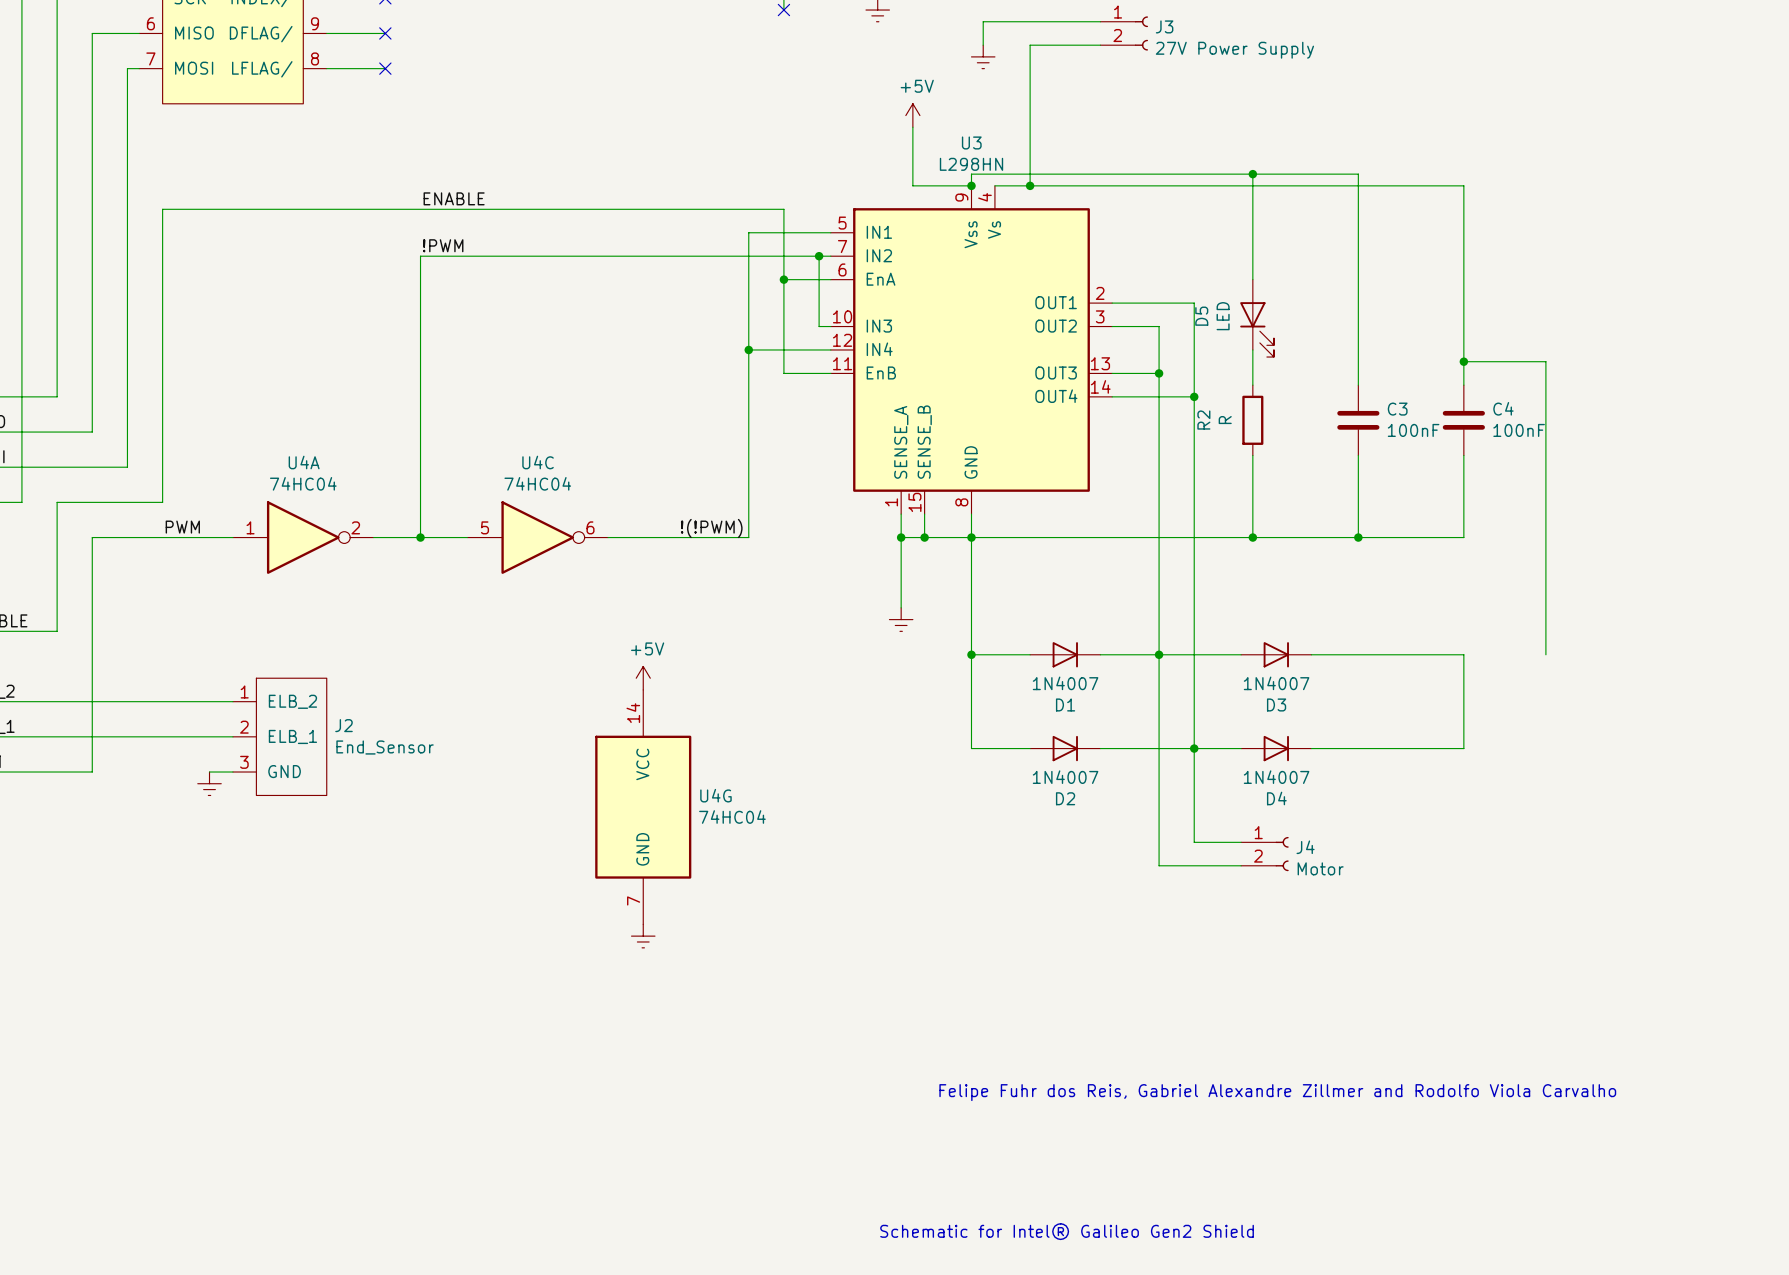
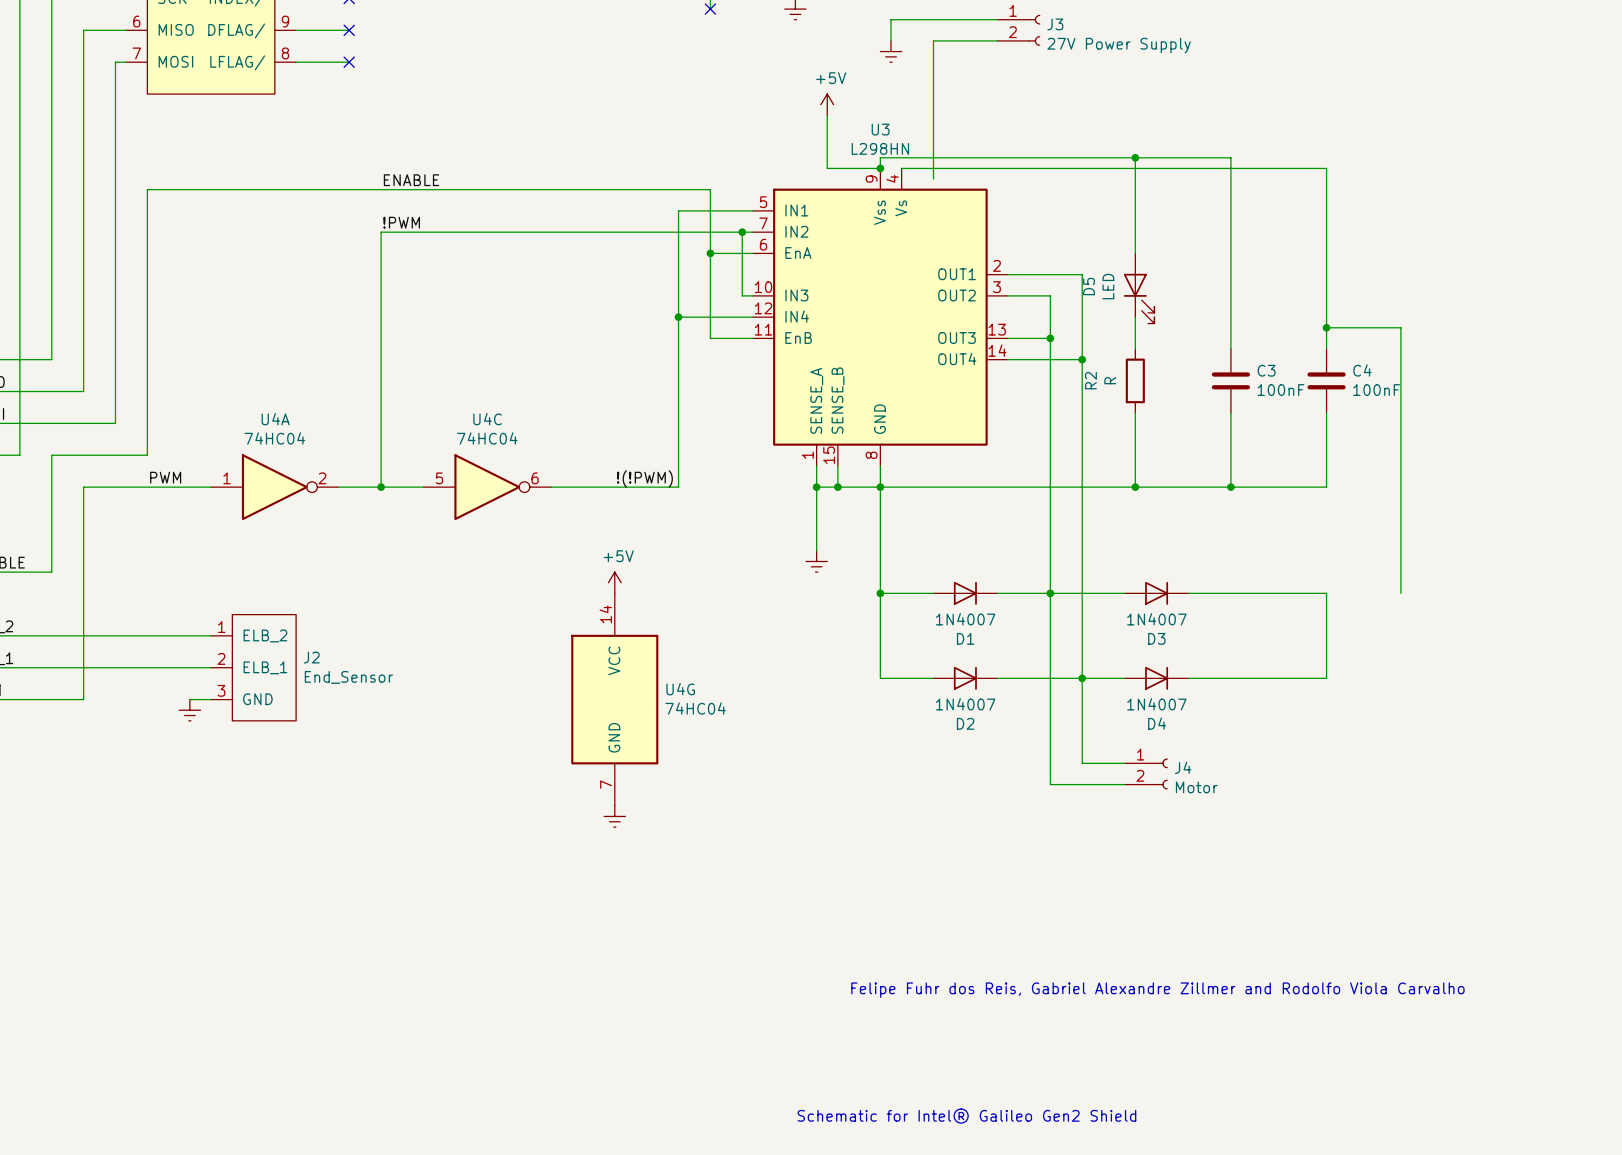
wire: none -> (933, 168) (933, 179)
junction: (1030, 185) -> none
power symbol position: +5V (643, 678) -> +5V (614, 582)
U4G position: (643, 807) -> (614, 699)
power symbol position: (643, 936) -> (614, 816)

